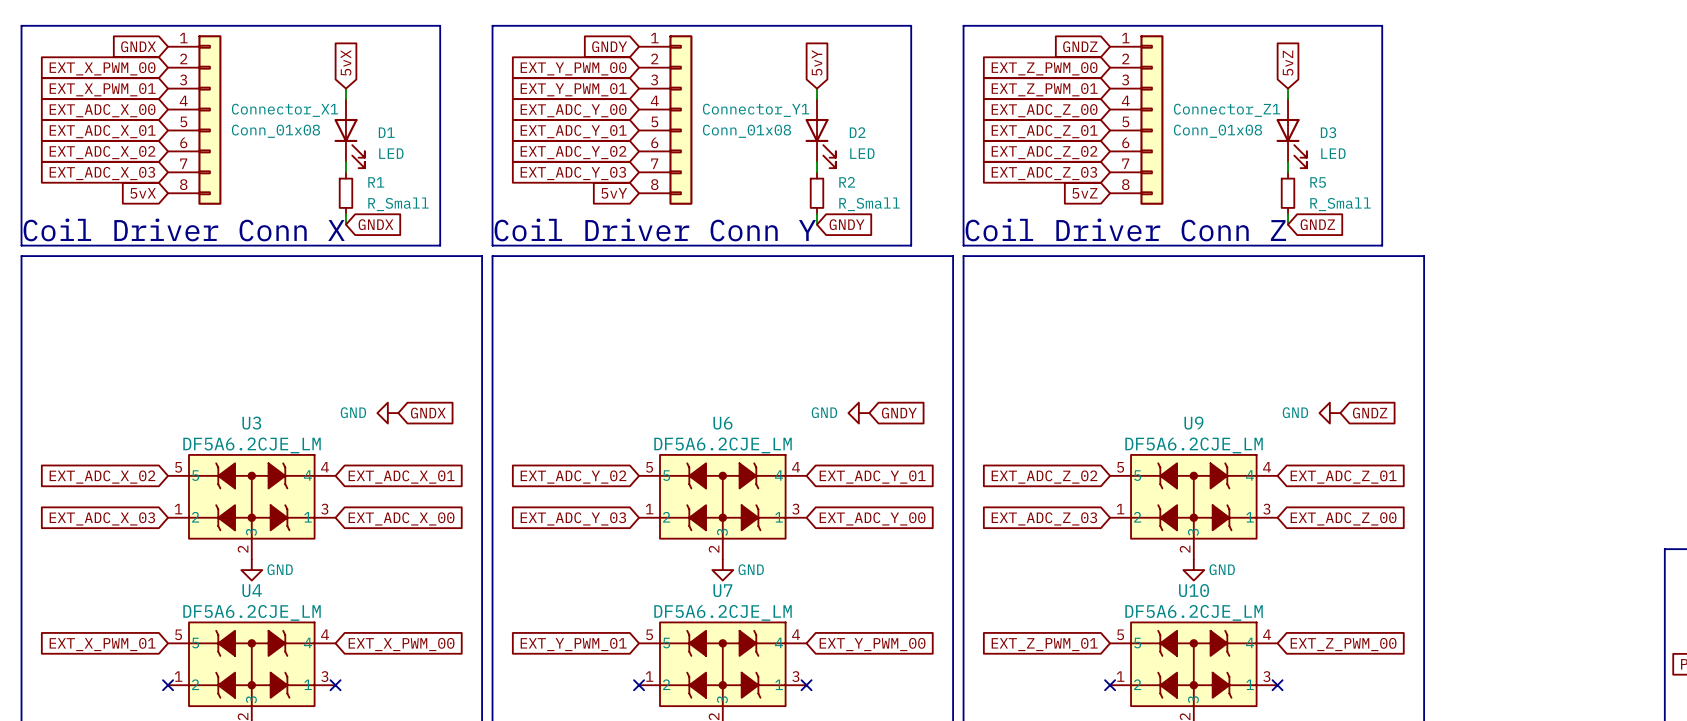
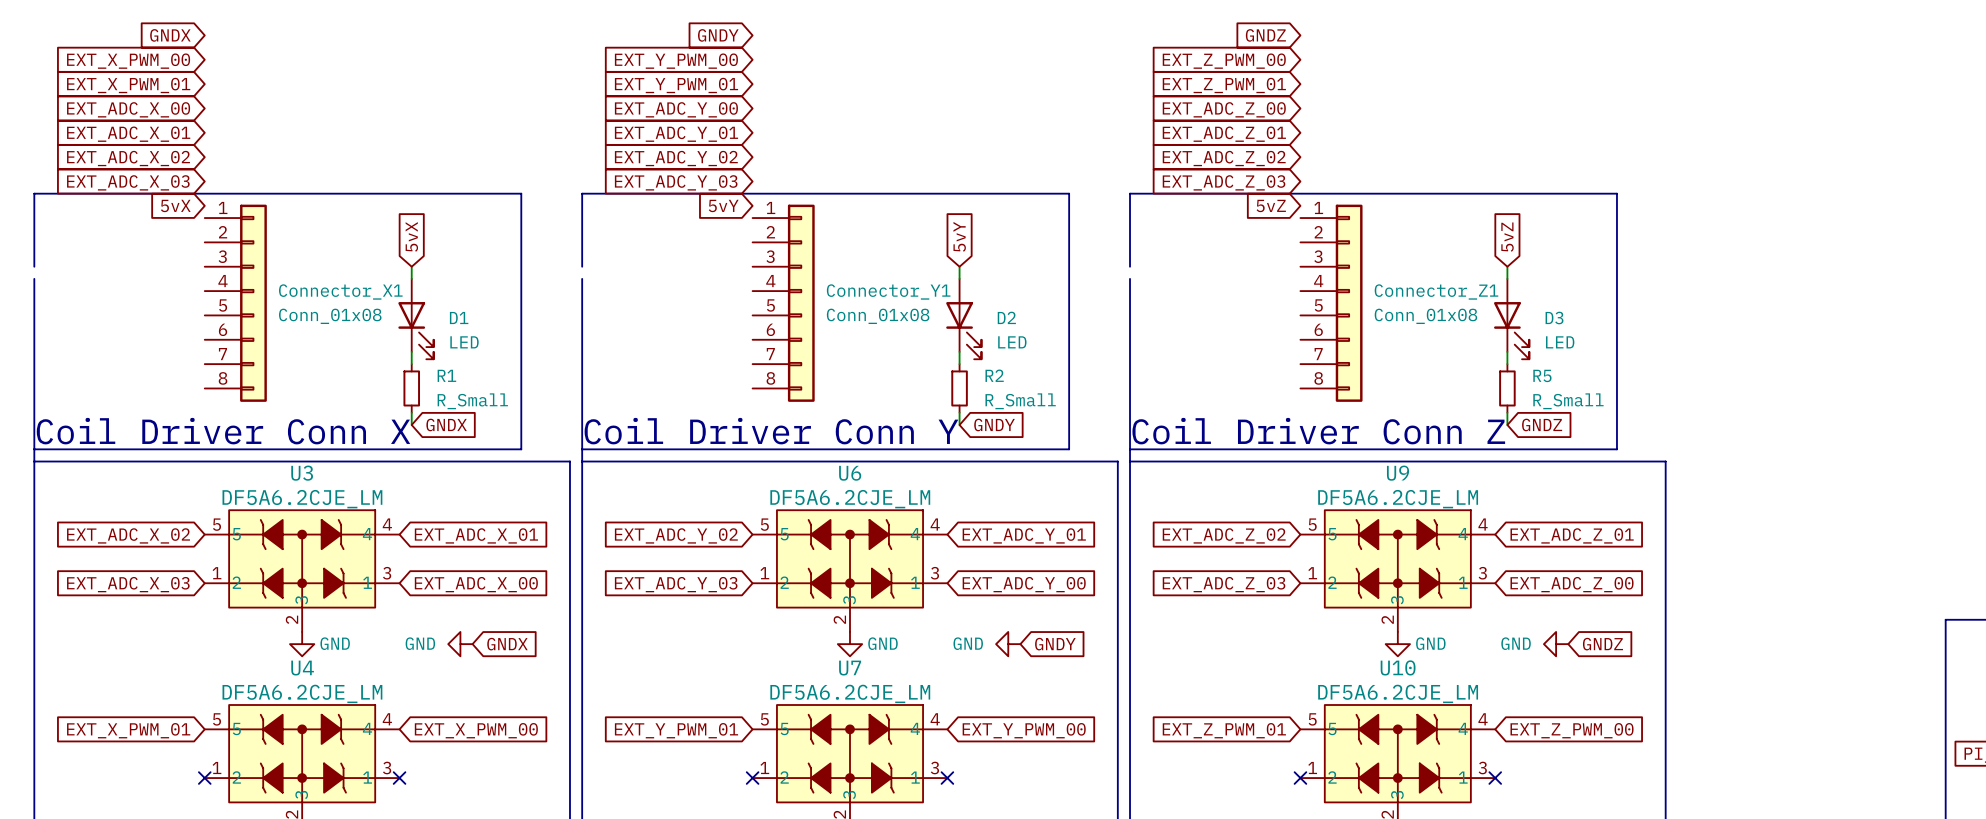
global label position: 5vX (346, 62) -> 5vX (411, 236)
global label position: 5vY (817, 62) -> 5vY (959, 236)
global label position: 5vZ (1288, 63) -> 5vZ (1507, 237)
wire: (345, 88) (345, 99) -> (411, 266) (411, 278)
wire: (817, 88) (817, 99) -> (959, 266) (959, 278)
wire: (1288, 88) (1288, 99) -> (1507, 266) (1507, 278)
Connector_X1 position: (194, 120) -> (235, 303)
Connector_Y1 position: (665, 120) -> (783, 303)
Connector_Z1 position: (1136, 120) -> (1331, 303)
D1 position: (349, 133) -> (415, 319)
D2 position: (820, 133) -> (963, 319)
D3 position: (1291, 133) -> (1511, 319)
wire: (345, 161) (345, 172) -> (411, 351) (411, 364)
wire: (817, 161) (817, 172) -> (959, 351) (959, 364)
wire: (1288, 161) (1288, 172) -> (1507, 351) (1507, 364)
line: (21, 182) (21, 25) (440, 25) (440, 182) -> (34, 193) (521, 193)
line: (492, 182) (492, 25) (911, 25) (911, 182) -> (582, 193) (1069, 193)
line: (963, 182) (963, 25) (1382, 25) (1382, 182) -> (1130, 193) (1616, 193)
R1 position: (345, 193) -> (411, 388)
R2 position: (817, 193) -> (959, 388)
R5 position: (1288, 193) -> (1507, 388)
wire: (345, 214) (345, 224) -> (411, 412) (411, 424)
wire: (817, 214) (817, 224) -> (959, 412) (959, 424)
wire: (1288, 214) (1288, 224) -> (1507, 412) (1507, 424)
global label: GNDX (375, 224) -> none
global label: GNDY (847, 224) -> none
global label: GNDZ (1317, 224) -> none
text position: Coil Driver Conn X (184, 229) -> Coil Driver Conn X (223, 431)
text position: Coil Driver Conn Y (655, 229) -> Coil Driver Conn Y (771, 431)
text position: Coil Driver Conn Z (1125, 229) -> Coil Driver Conn Z (1318, 431)
line: (21, 245) (440, 245) -> (34, 449) (521, 449) (521, 266)
line: (492, 245) (911, 245) -> (582, 449) (1069, 449) (1069, 266)
line: (963, 245) (1382, 245) -> (1130, 449) (1616, 449) (1616, 266)
line: (21, 256) (482, 256) (482, 413) -> (34, 461) (569, 461)
line: (492, 256) (953, 256) (953, 413) -> (582, 461) (1117, 461)
line: (963, 256) (1424, 256) (1424, 413) -> (1130, 461) (1665, 461)
power symbol position: GND (387, 413) -> GND (460, 644)
global label position: GNDX (428, 413) -> GNDX (446, 424)
power symbol position: GND (858, 413) -> GND (1008, 644)
global label position: GNDY (899, 413) -> GNDY (994, 424)
power symbol position: GND (1329, 413) -> GND (1556, 644)
global label position: GNDZ (1370, 413) -> GNDZ (1542, 424)
global label: none -> GNDX (507, 644)
global label: none -> GNDY (1055, 644)
global label: none -> GNDZ (1602, 644)

